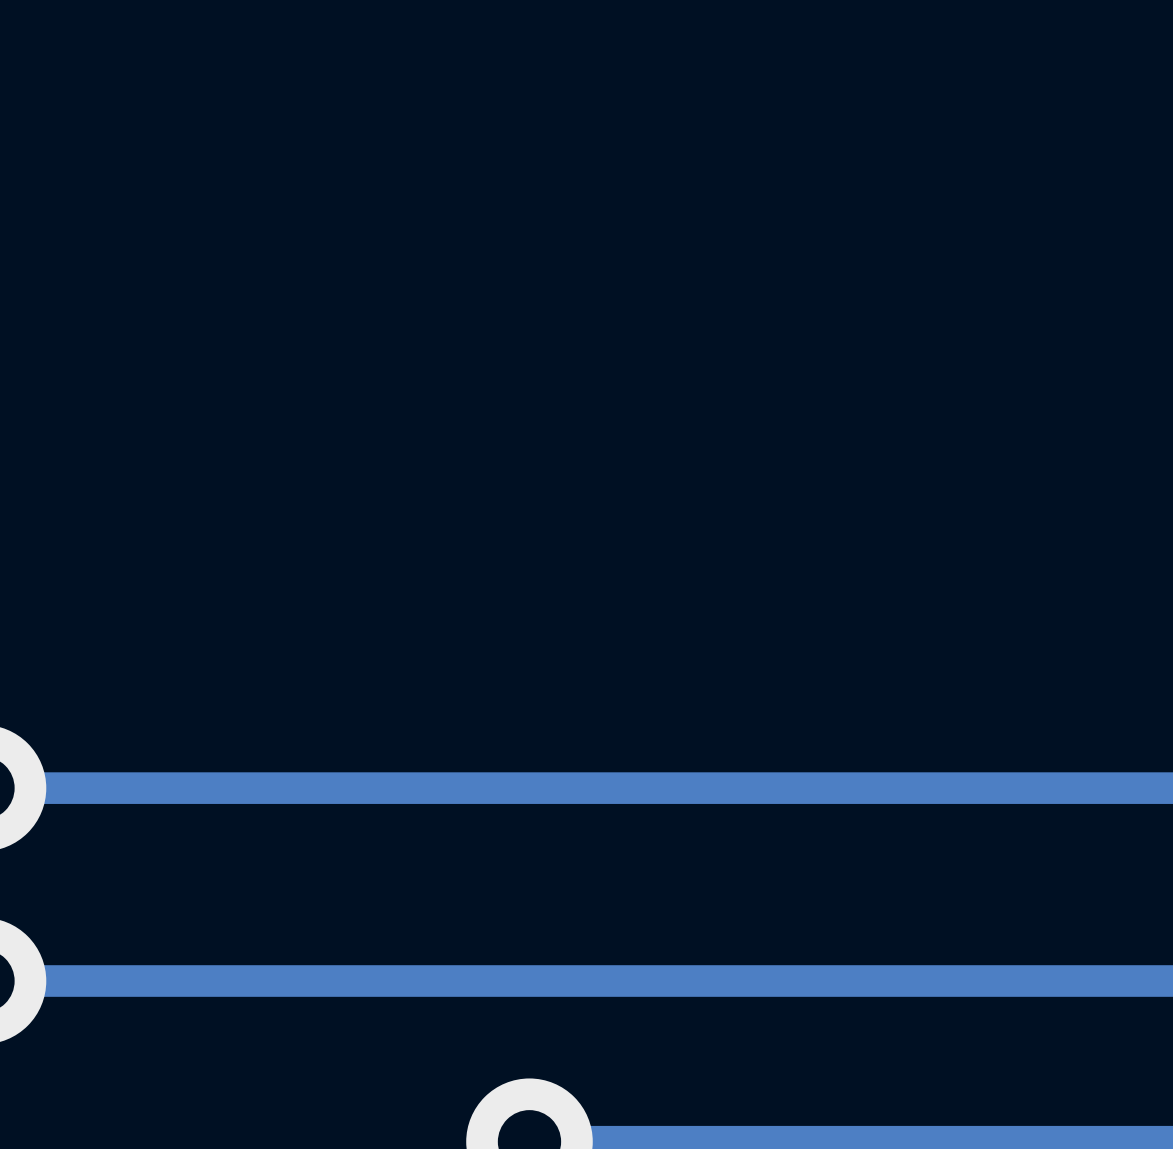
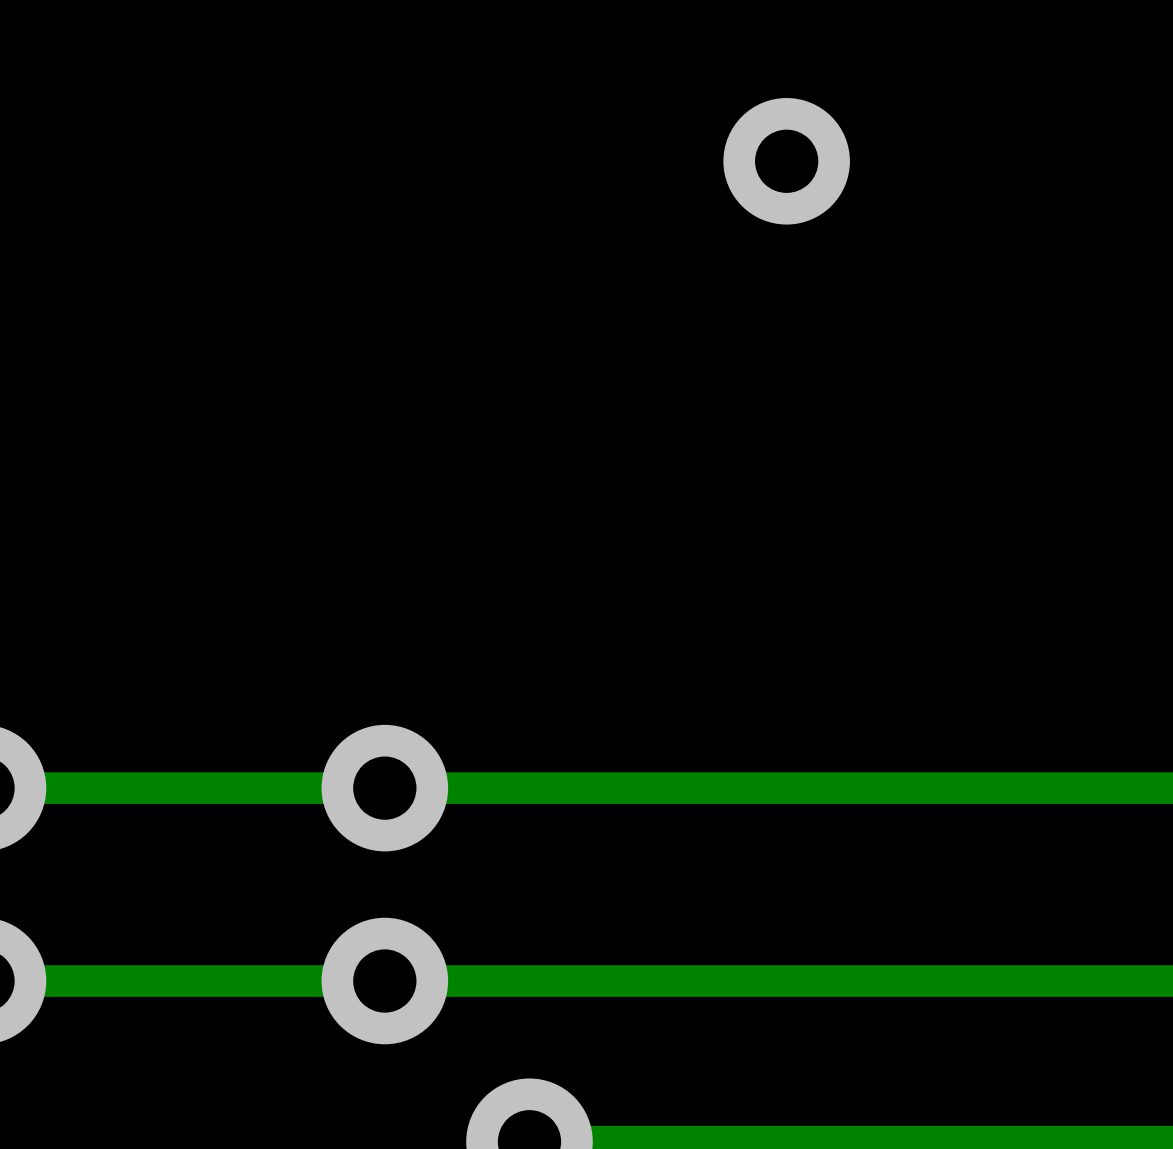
via: none -> (786, 161)
via: none -> (384, 788)
via: none -> (384, 981)

